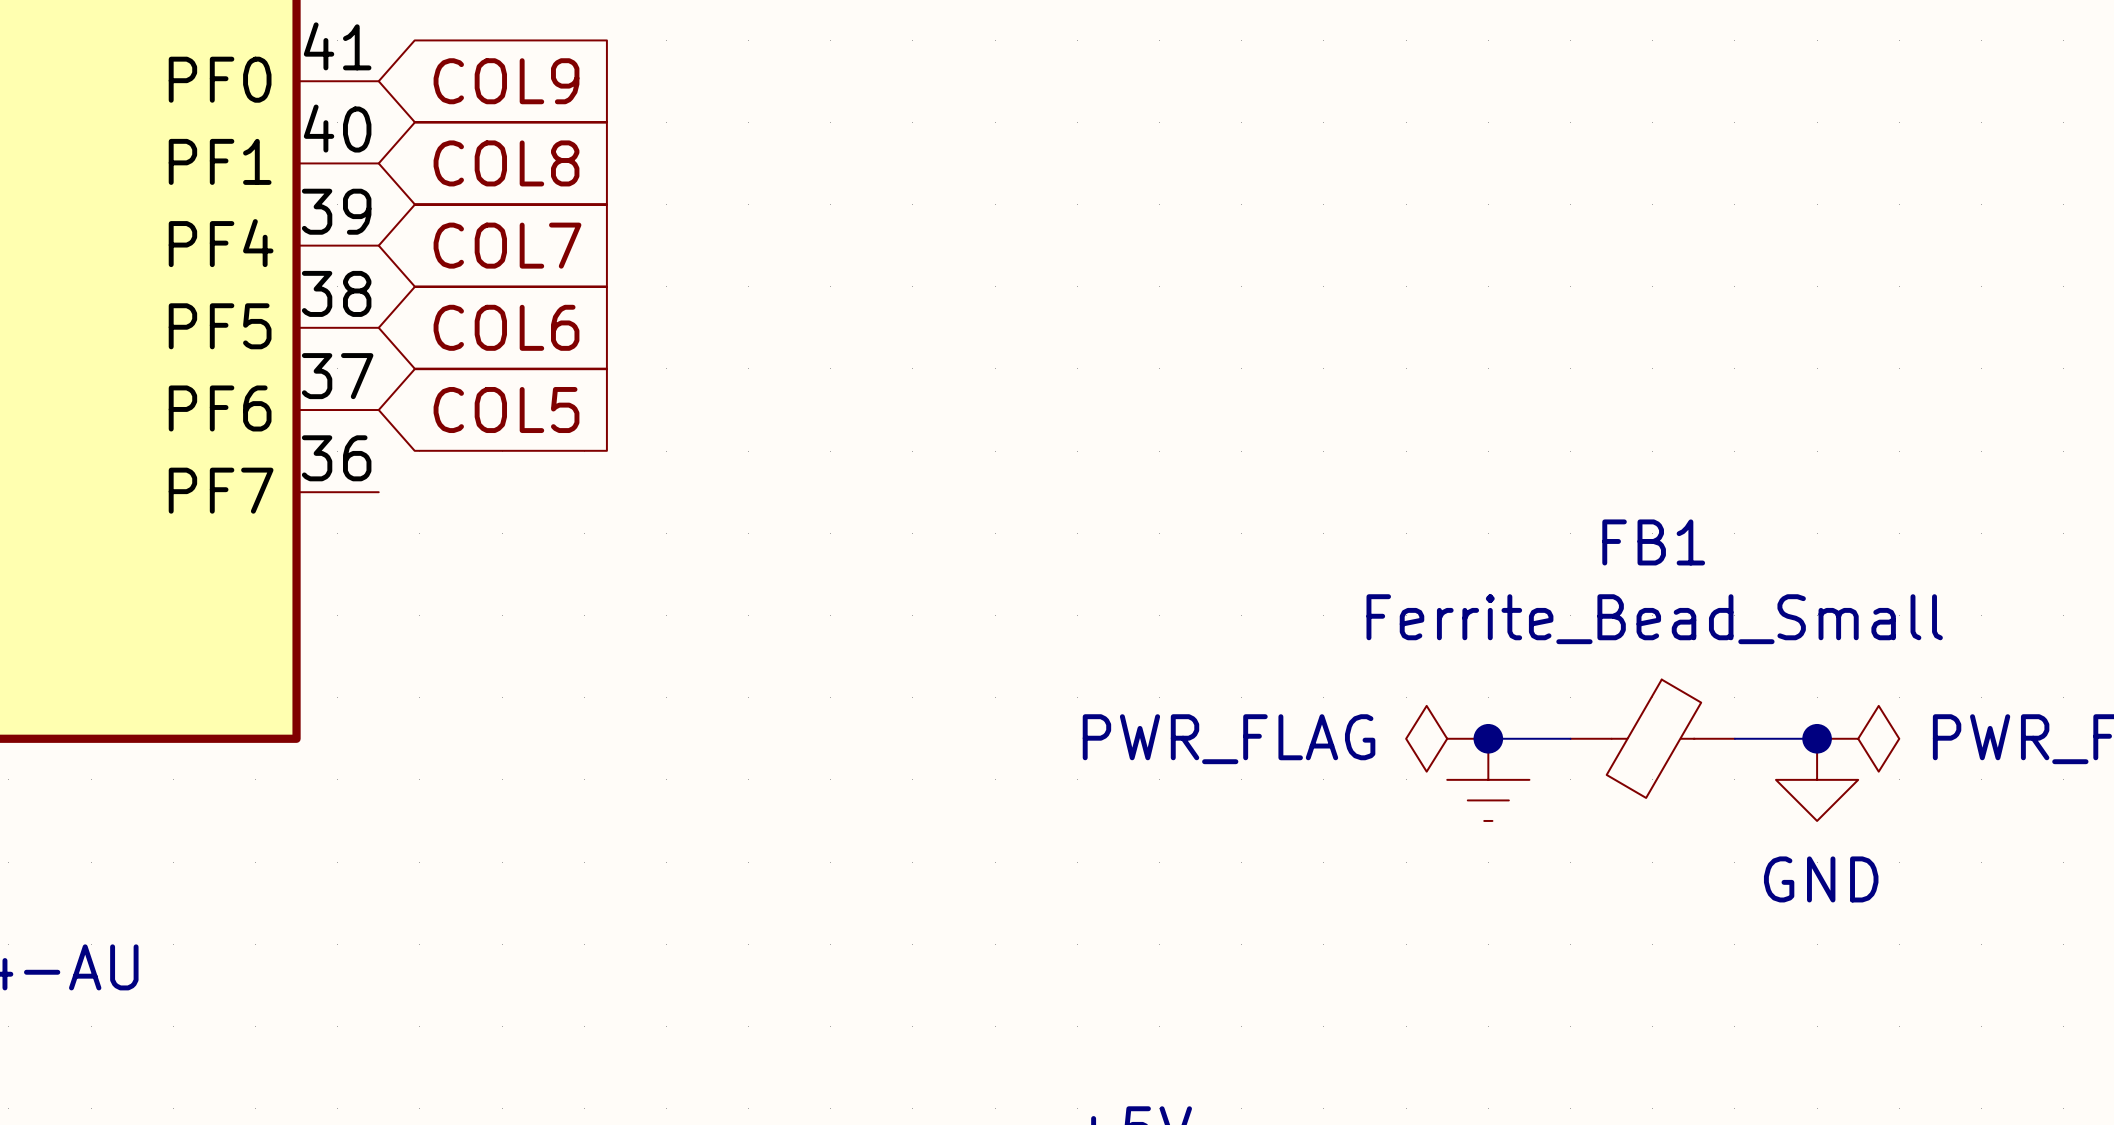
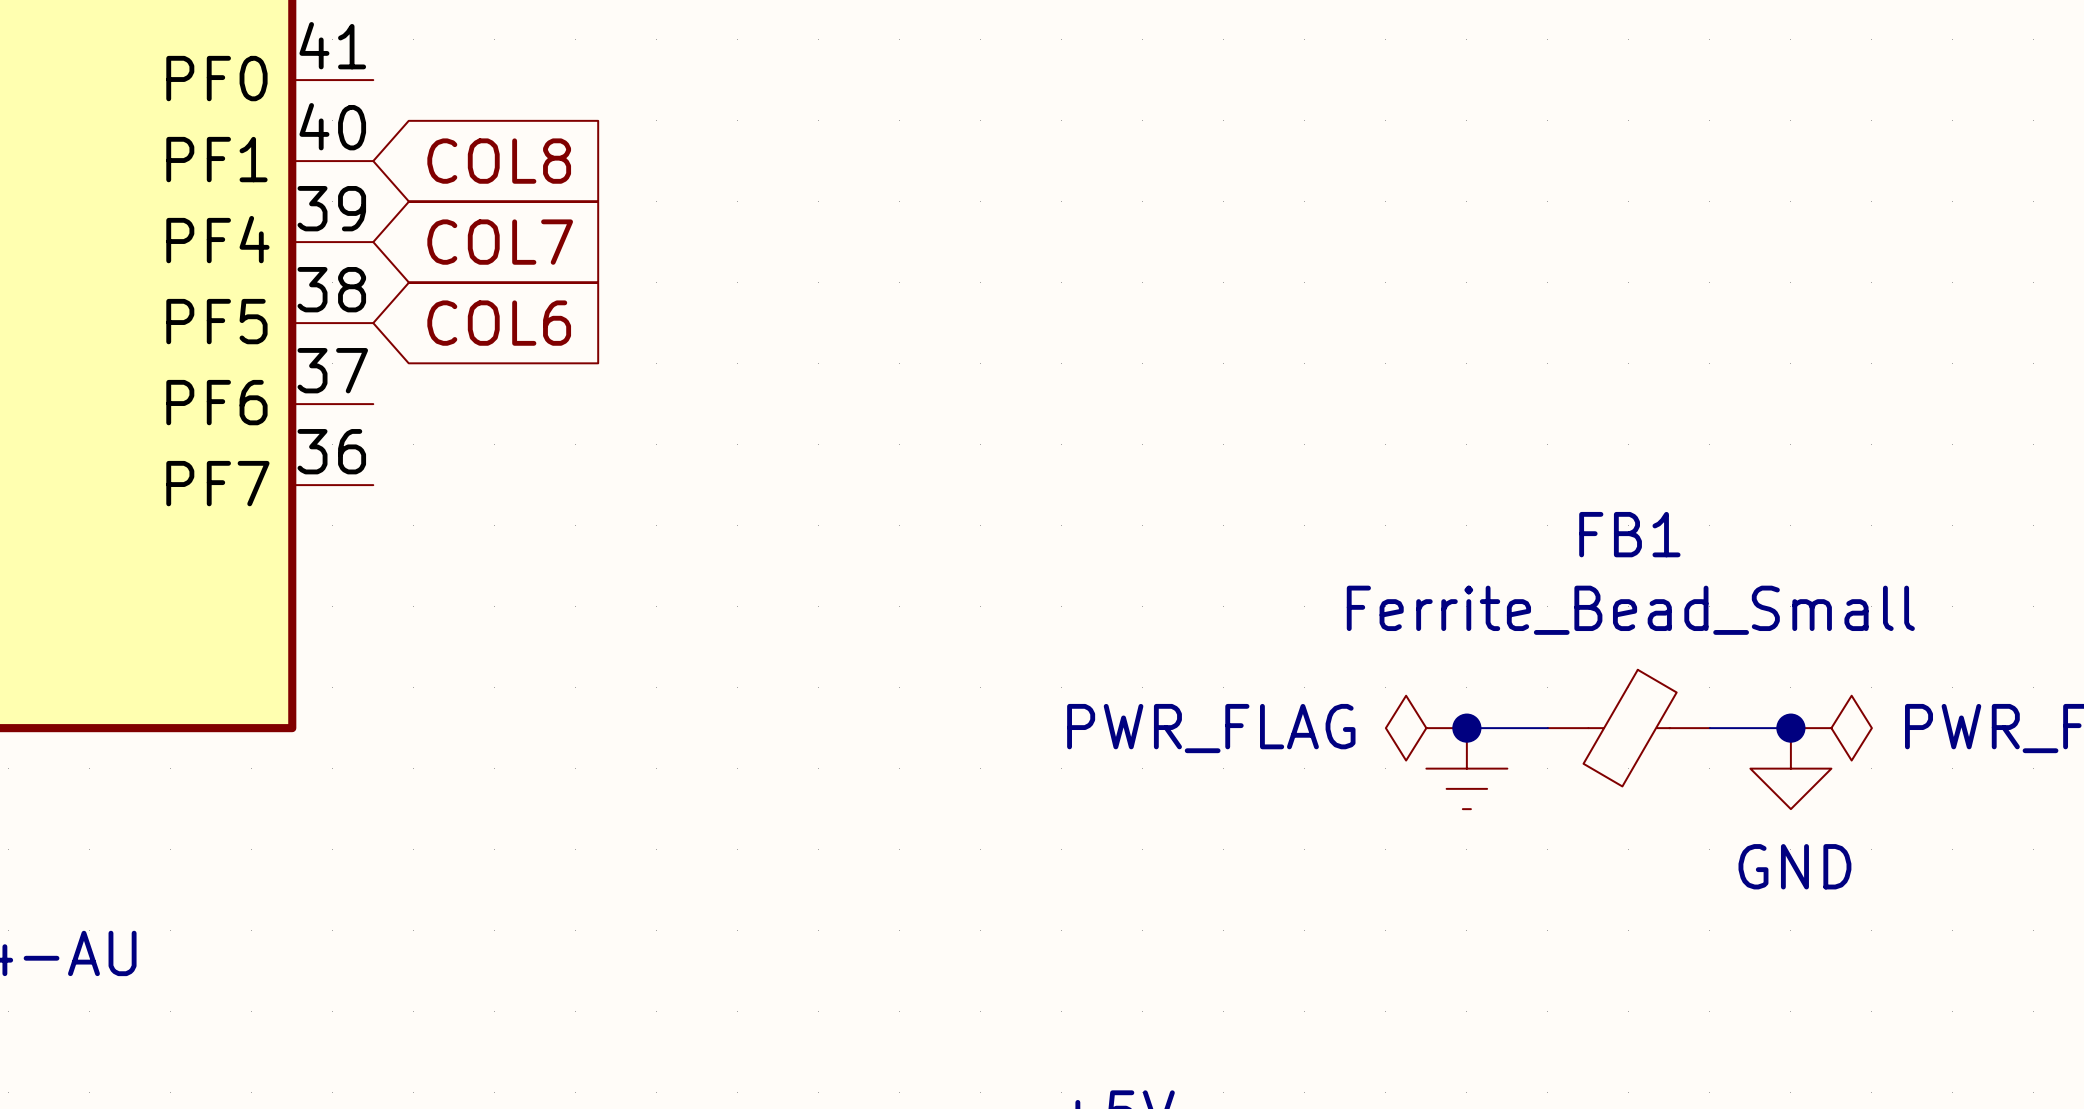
global label: COL9 (506, 81) -> none
global label: COL5 (506, 410) -> none

